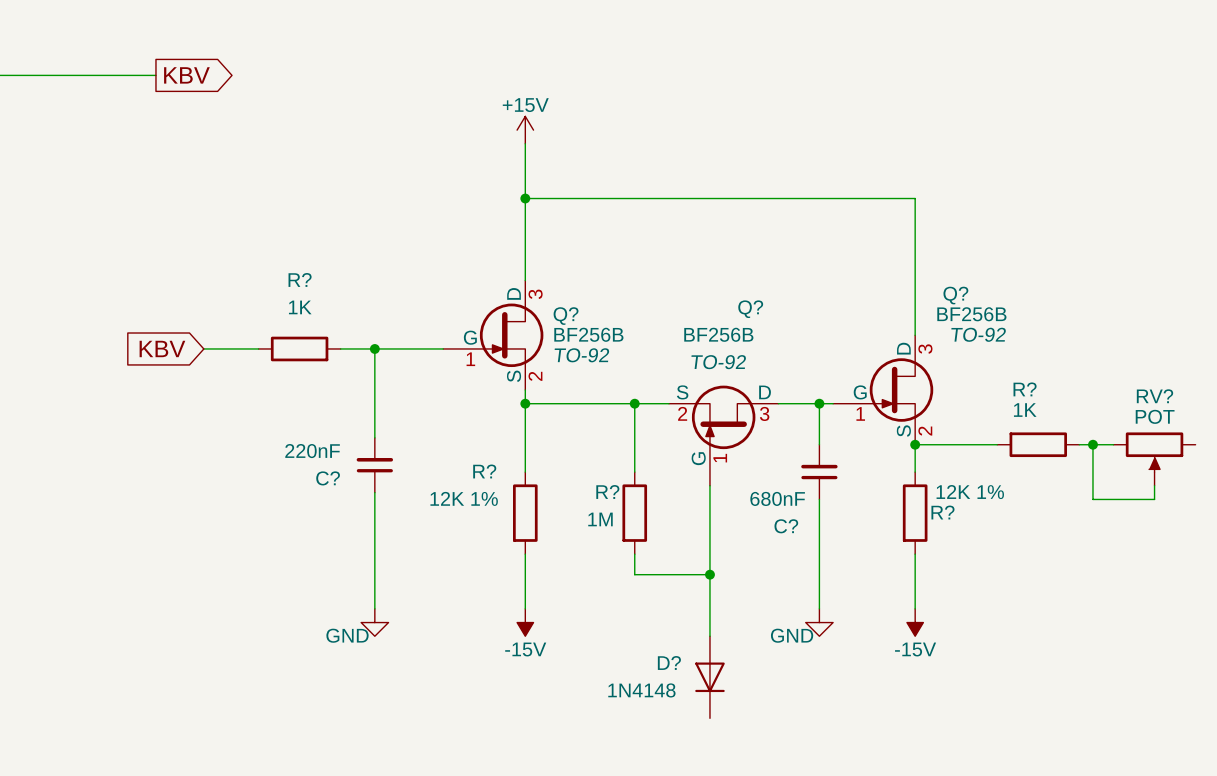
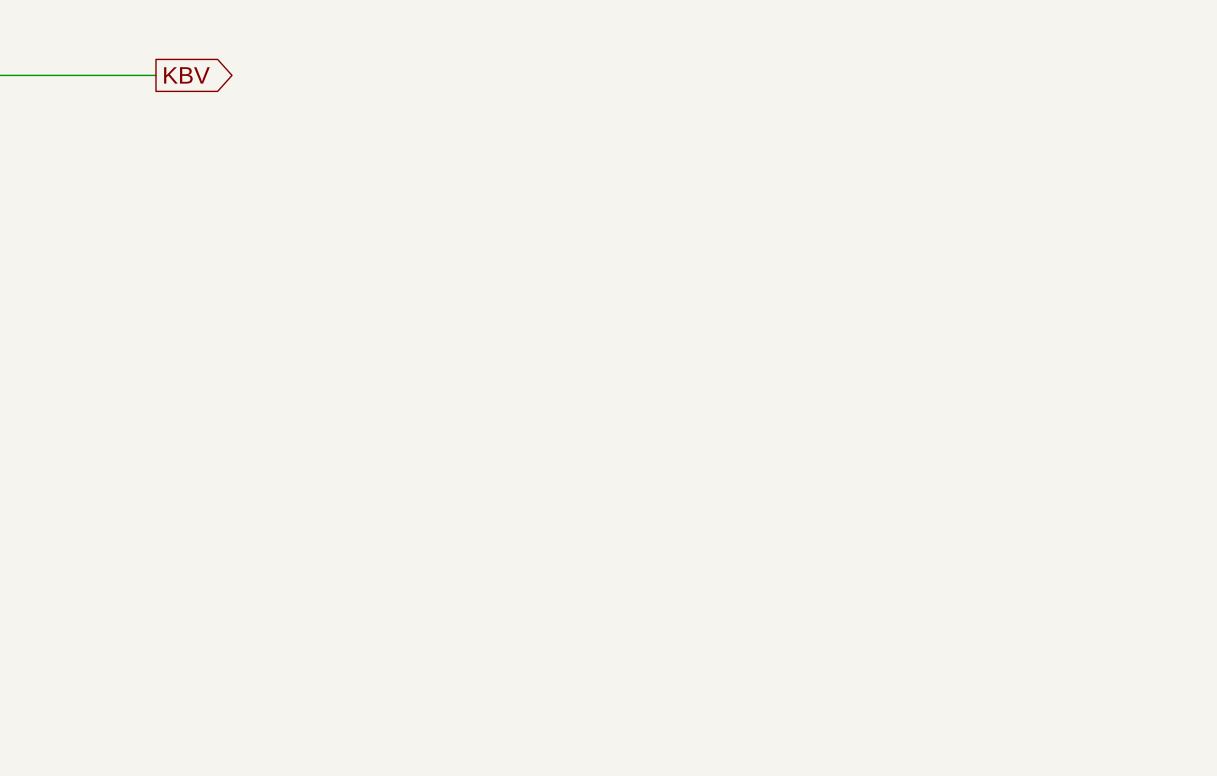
power symbol: +15V (525, 130) -> none
wire: (525, 143) (525, 280) -> none
wire: (525, 198) (915, 198) (915, 335) -> none
junction: (525, 198) -> none
Q?: BF256B (493, 335) -> none
global label: KBV (162, 348) -> none
wire: (203, 348) (258, 348) -> none
R?: 1K (299, 348) -> none
wire: (340, 348) (443, 348) -> none
wire: (374, 348) (374, 437) -> none
junction: (374, 348) -> none
wire: (525, 390) (525, 472) -> none
Q?: BF256B (883, 390) -> none
wire: (525, 403) (668, 403) -> none
junction: (525, 403) -> none
wire: (634, 403) (634, 472) -> none
junction: (634, 403) -> none
wire: (778, 403) (833, 403) -> none
wire: (819, 403) (819, 444) -> none
junction: (819, 403) -> none
Q?: BF256B (723, 435) -> none
junction: (915, 444) -> none
wire: (997, 444) (915, 444) (915, 472) -> none
R?: 1K (1038, 444) -> none
wire: (1079, 444) (1113, 444) -> none
wire: (1092, 444) (1092, 499) (1154, 499) (1154, 485) -> none
junction: (1092, 444) -> none
RV?: POT (1154, 459) -> none
C?: 220nF (374, 465) -> none
C?: 680nF (819, 472) -> none
wire: (709, 485) (709, 636) -> none
wire: (374, 492) (374, 608) -> none
wire: (819, 499) (819, 608) -> none
R?: 12K 1% (525, 513) -> none
R?: 1M (634, 513) -> none
R?: 12K 1% (915, 513) -> none
wire: (525, 554) (525, 608) -> none
wire: (634, 554) (634, 574) (709, 574) -> none
wire: (915, 554) (915, 608) -> none
junction: (709, 574) -> none
power symbol: GND (374, 622) -> none
power symbol: -15V (525, 622) -> none
power symbol: GND (819, 622) -> none
power symbol: -15V (915, 622) -> none
D?: 1N4148 (709, 677) -> none

